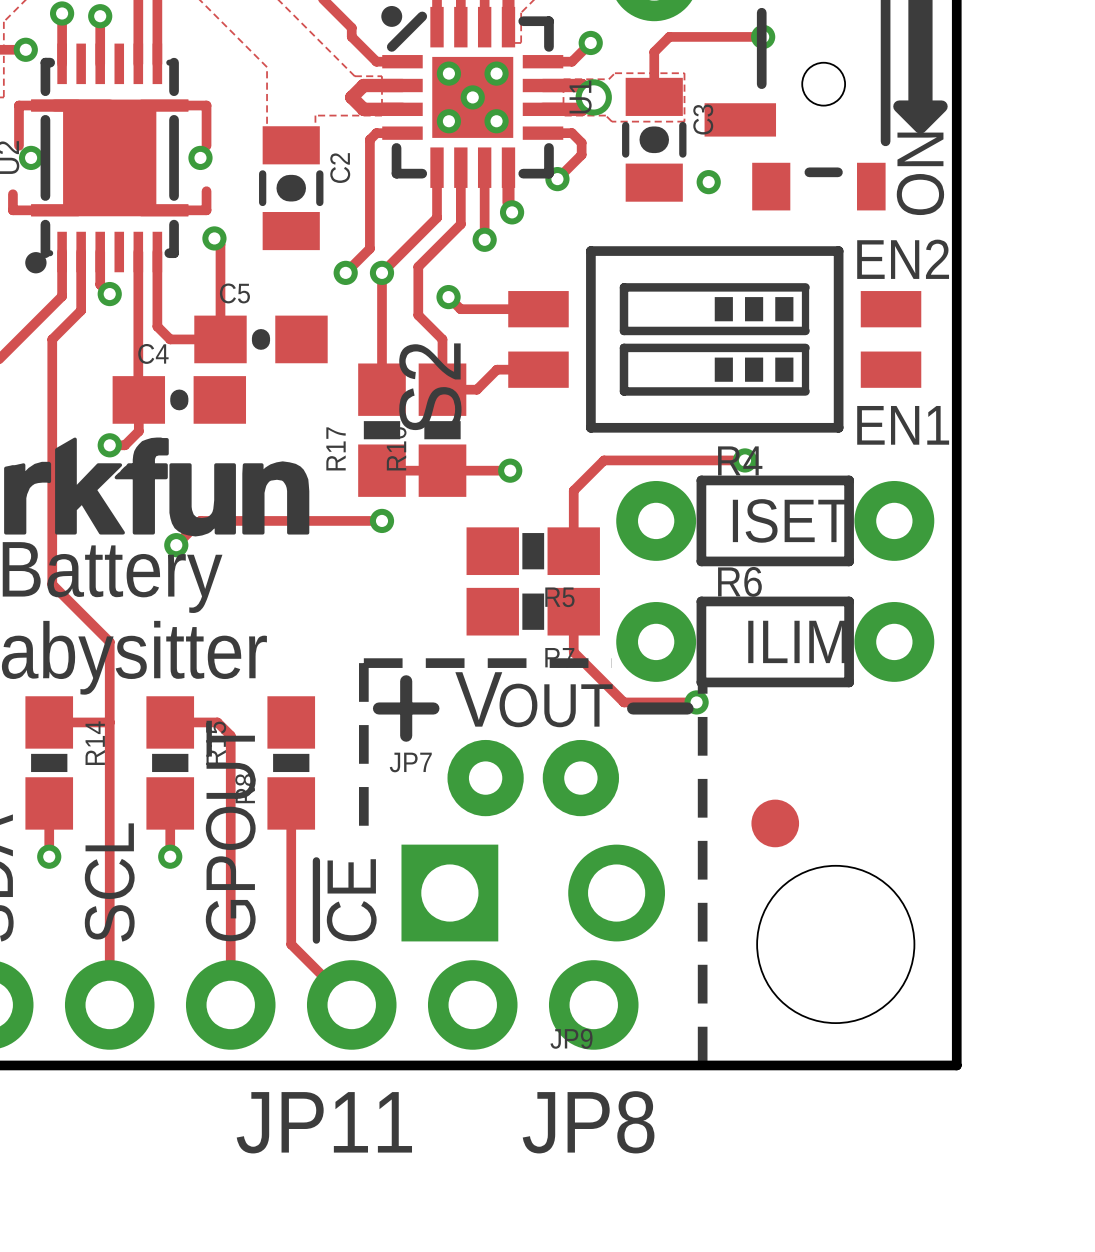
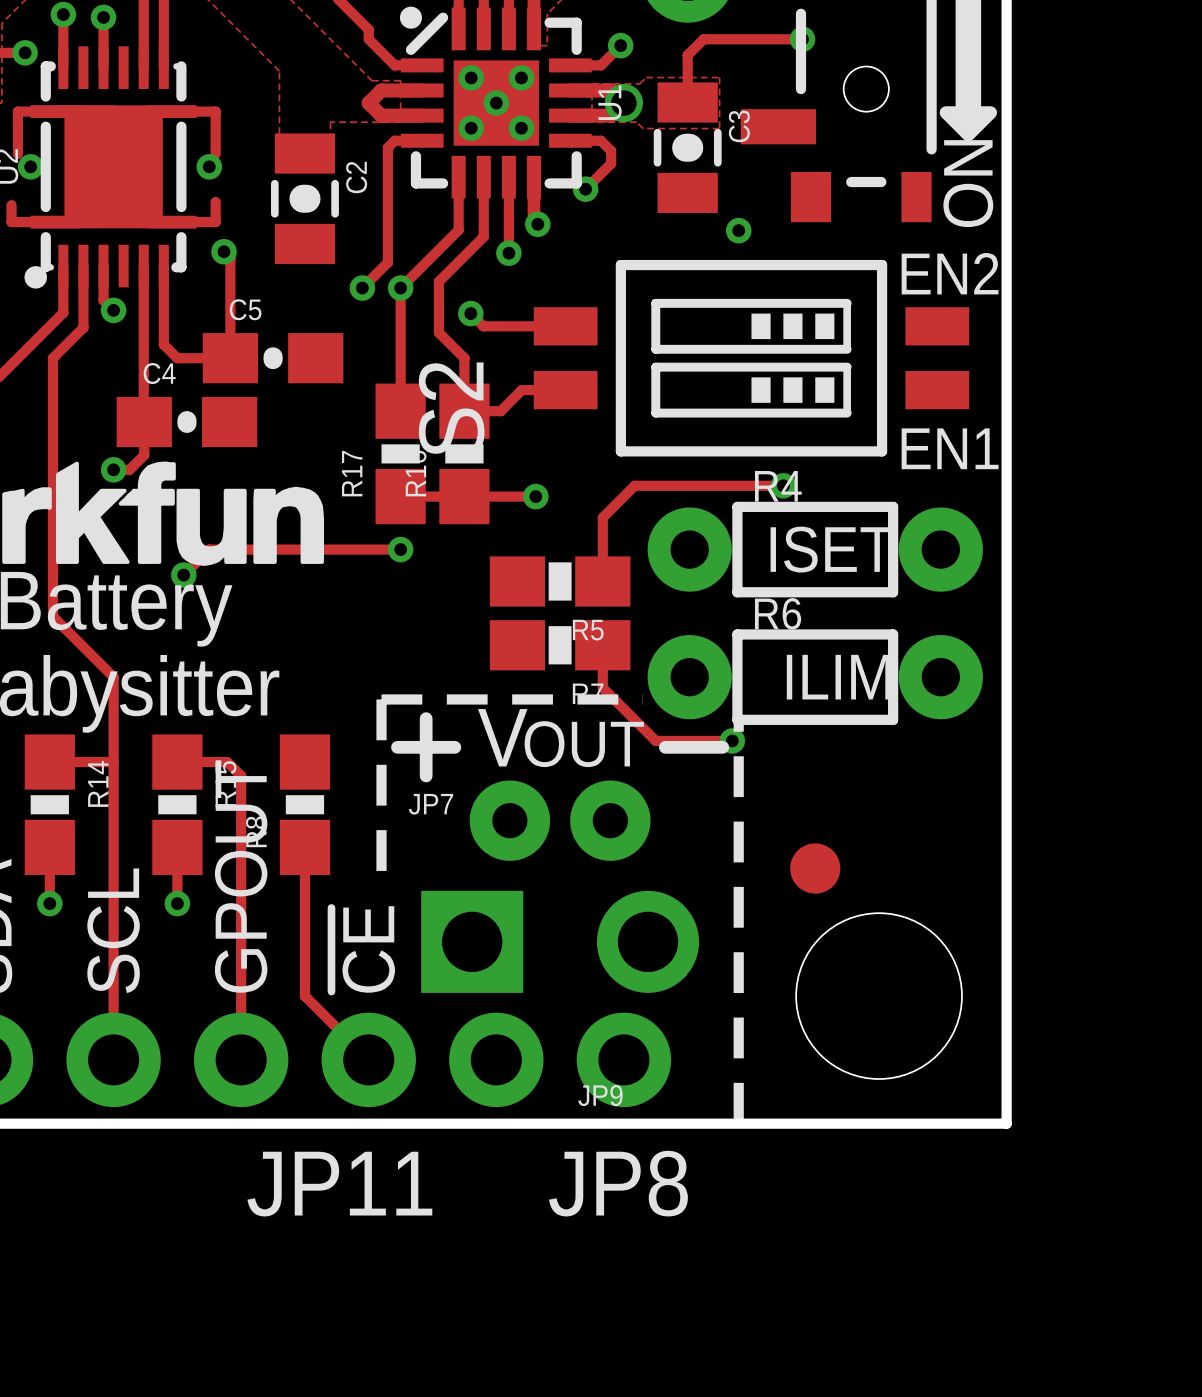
via position: (708, 182) -> (738, 230)

